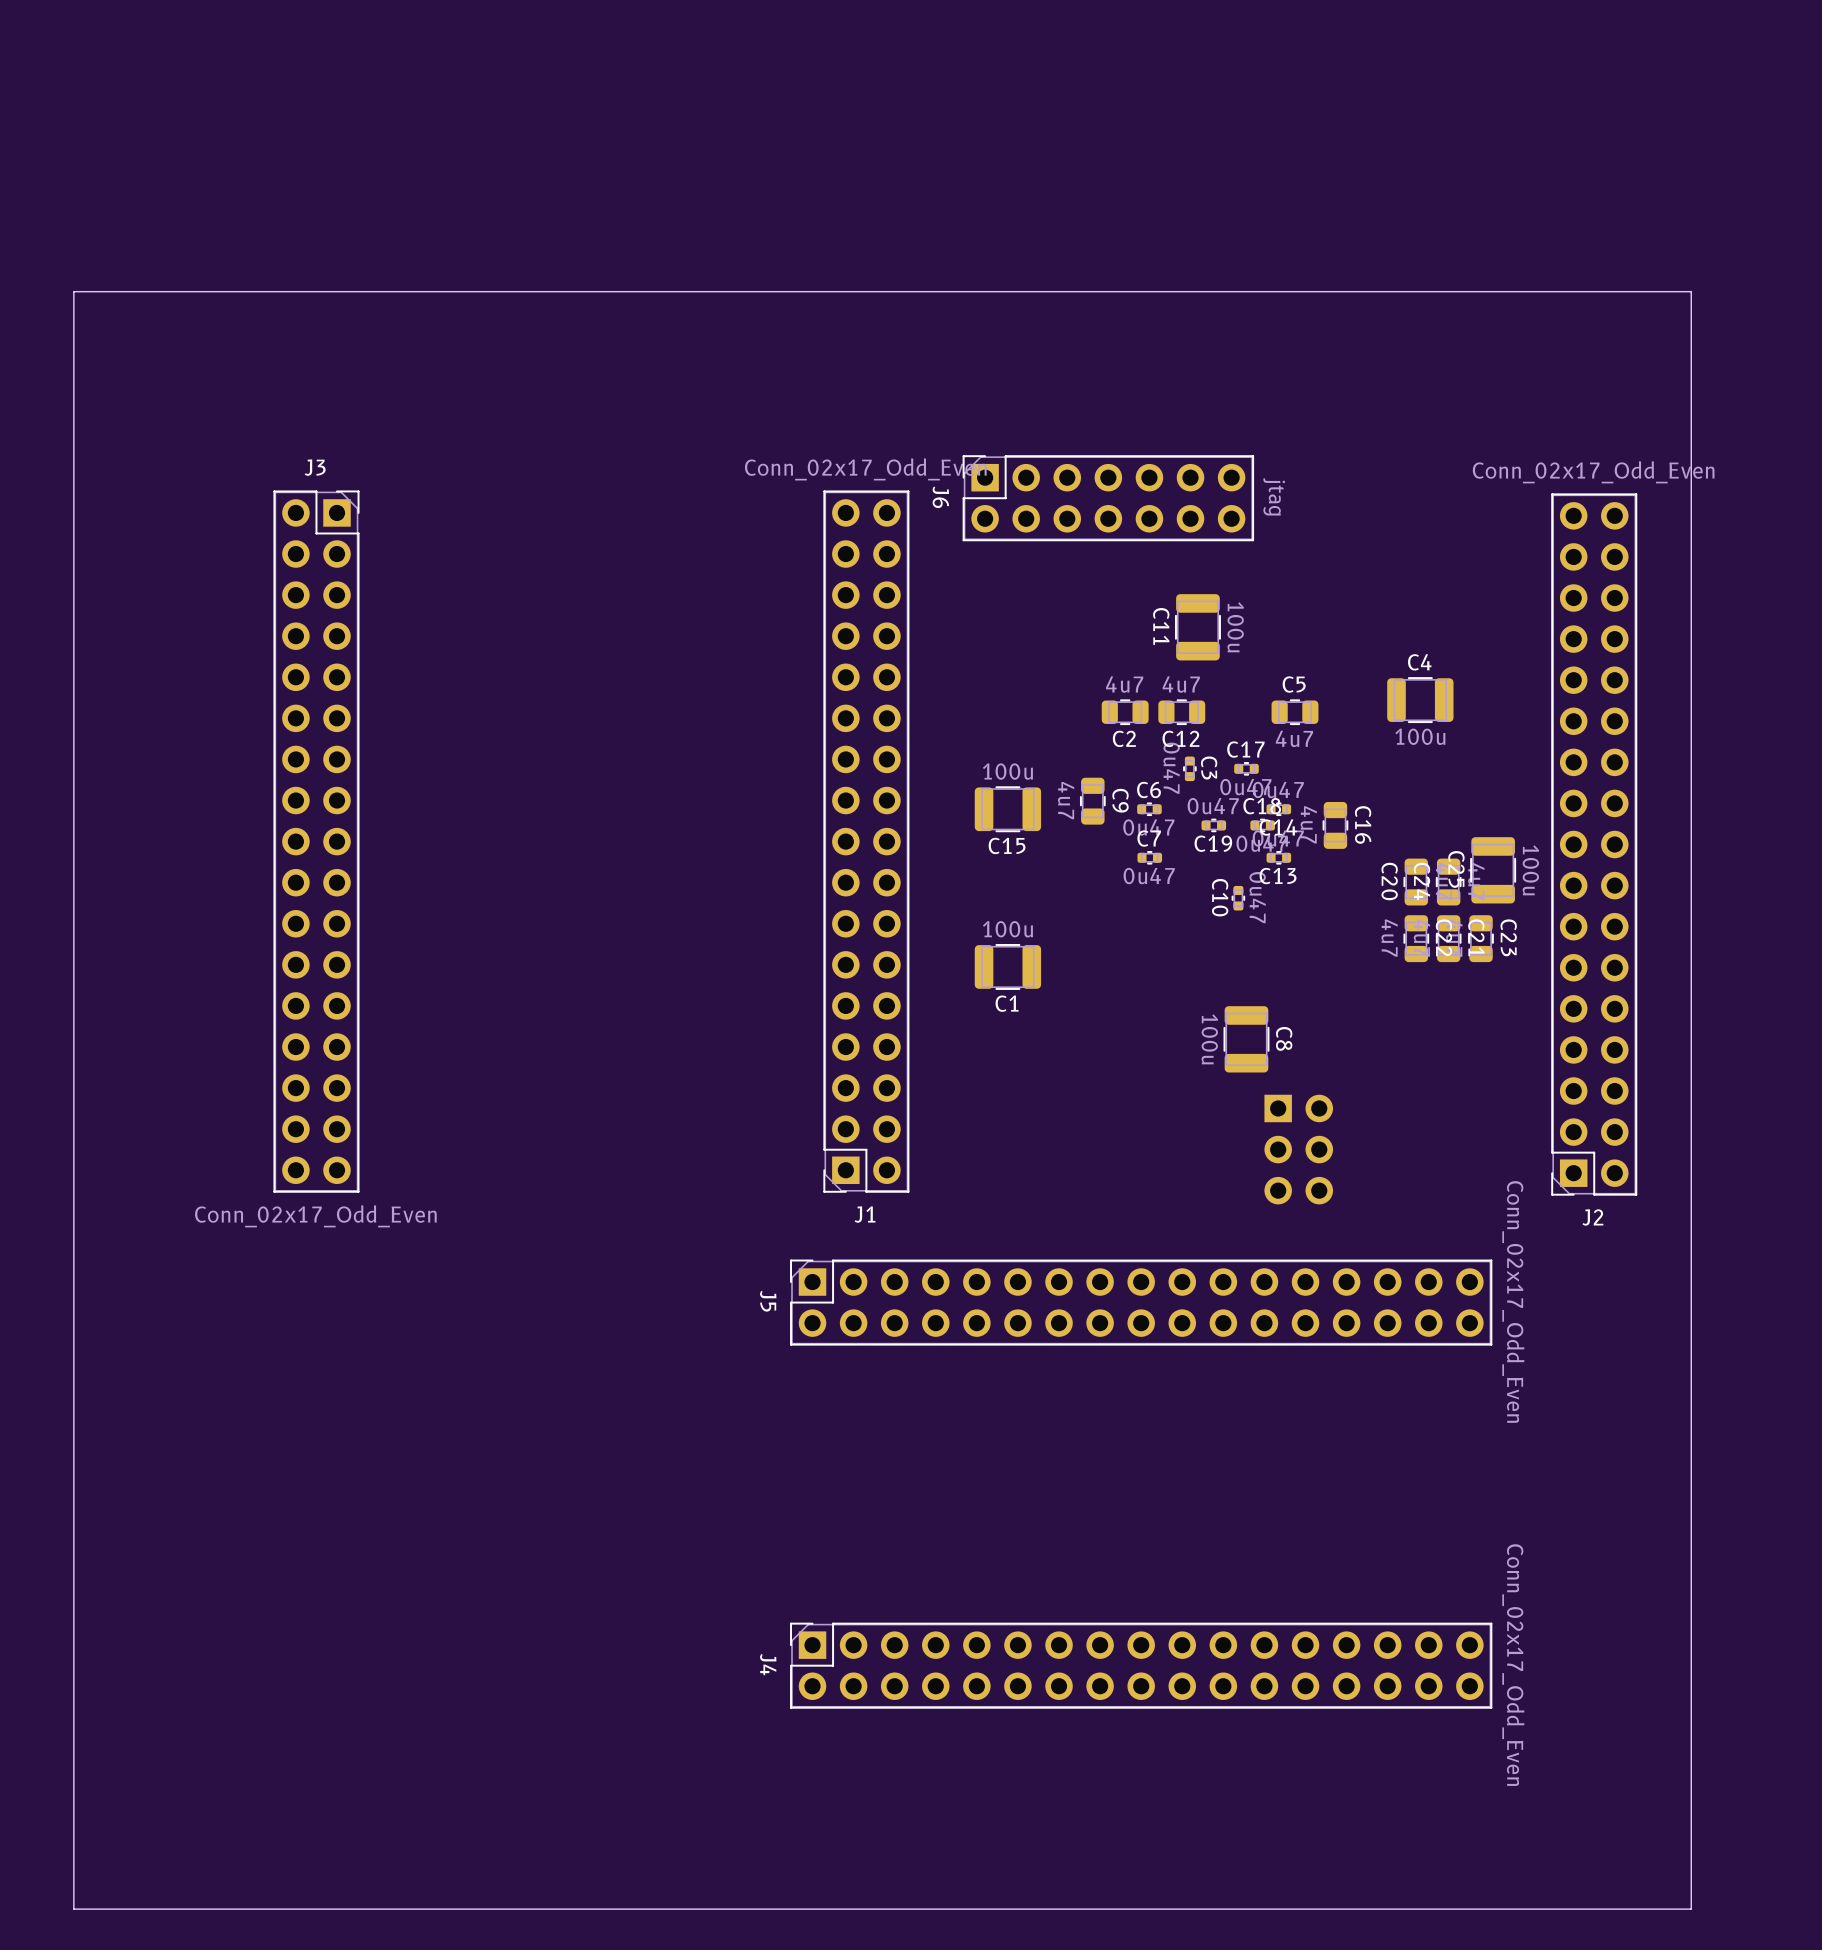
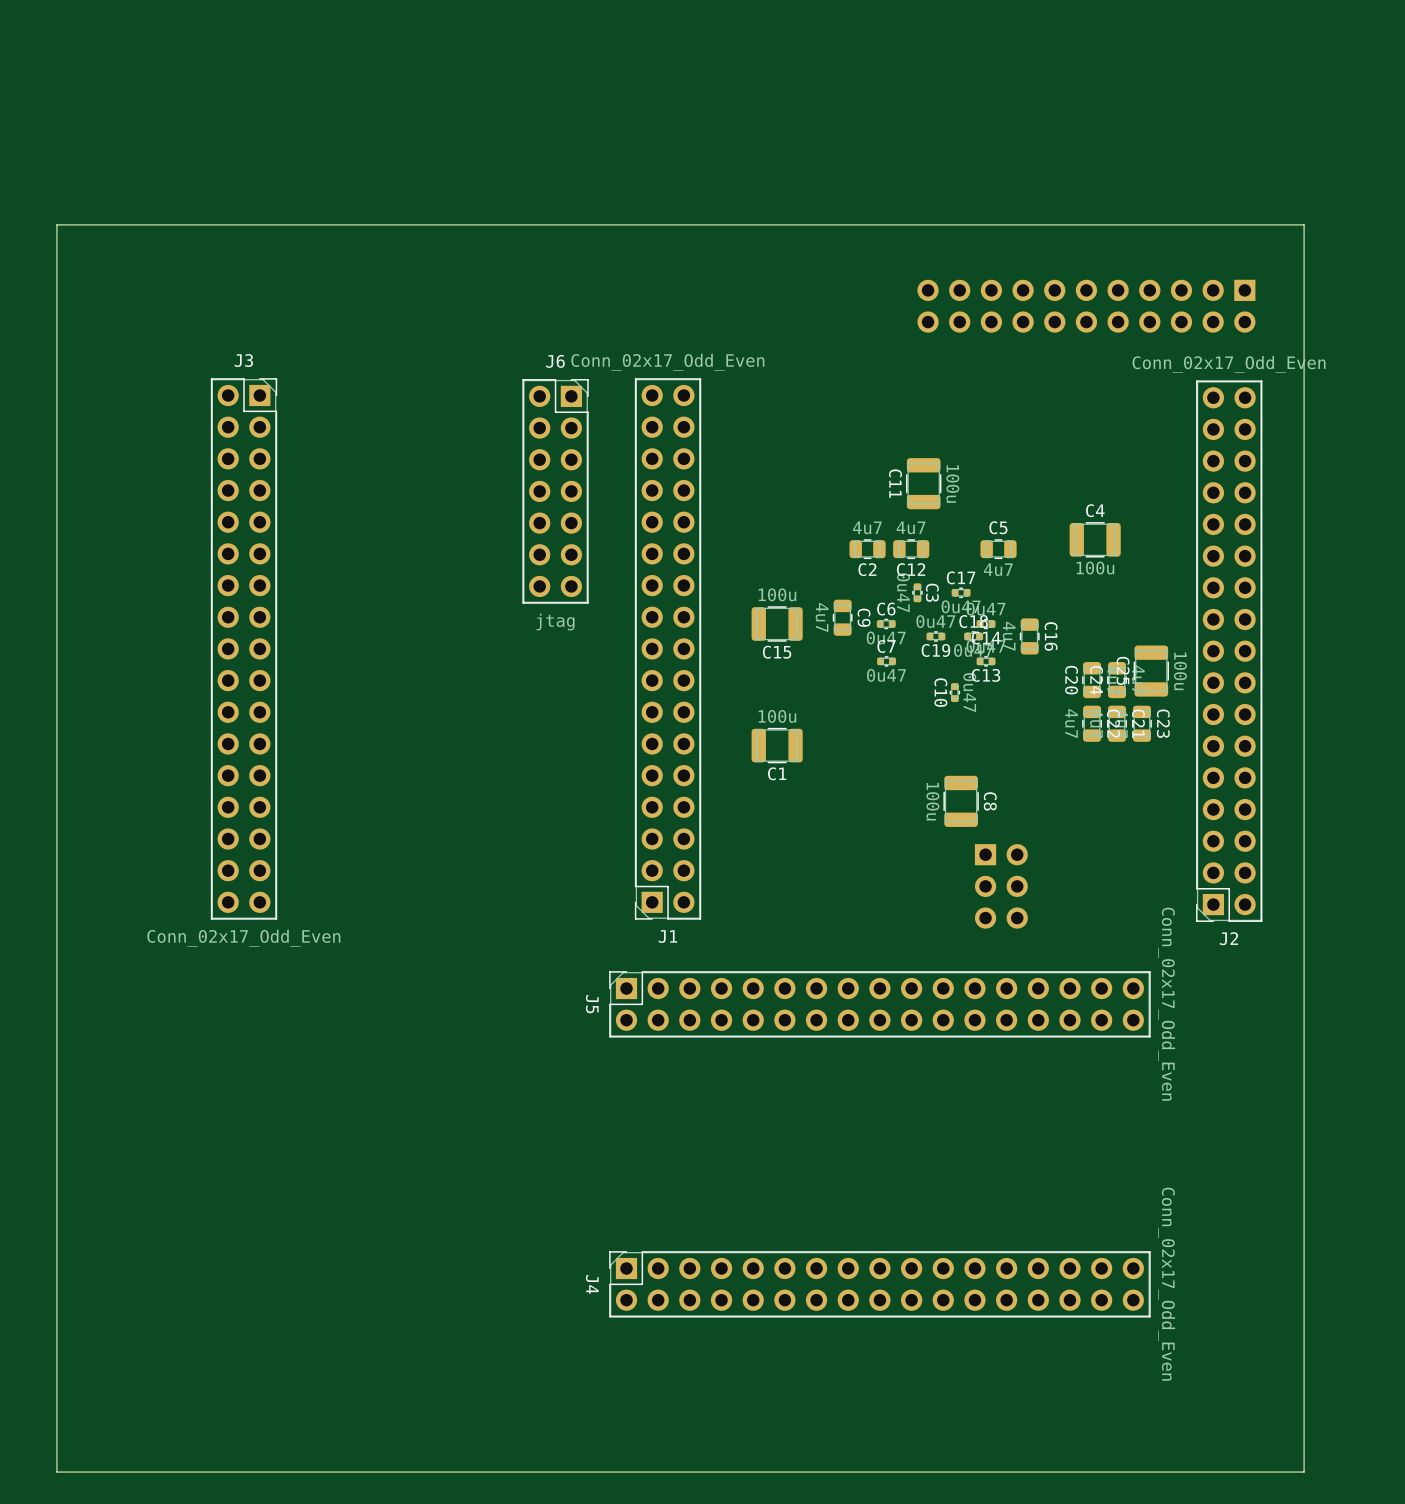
part: none -> (1086, 306)
J6 rotation: 0° (1108, 498) -> 90° clockwise (555, 491)
J6 position: (1108, 498) -> (555, 491)

